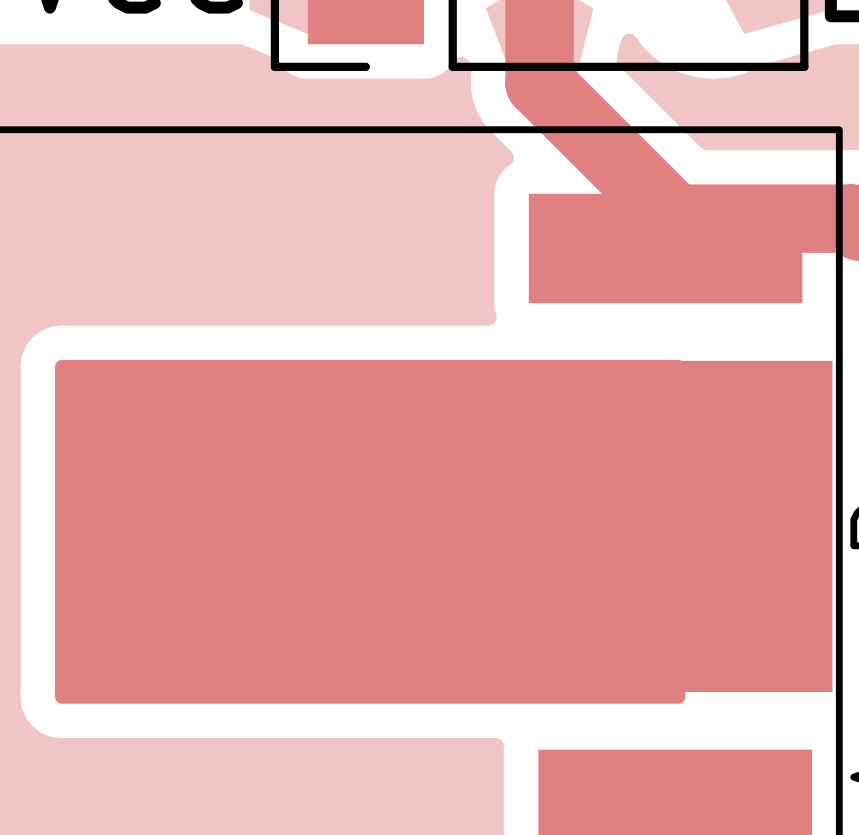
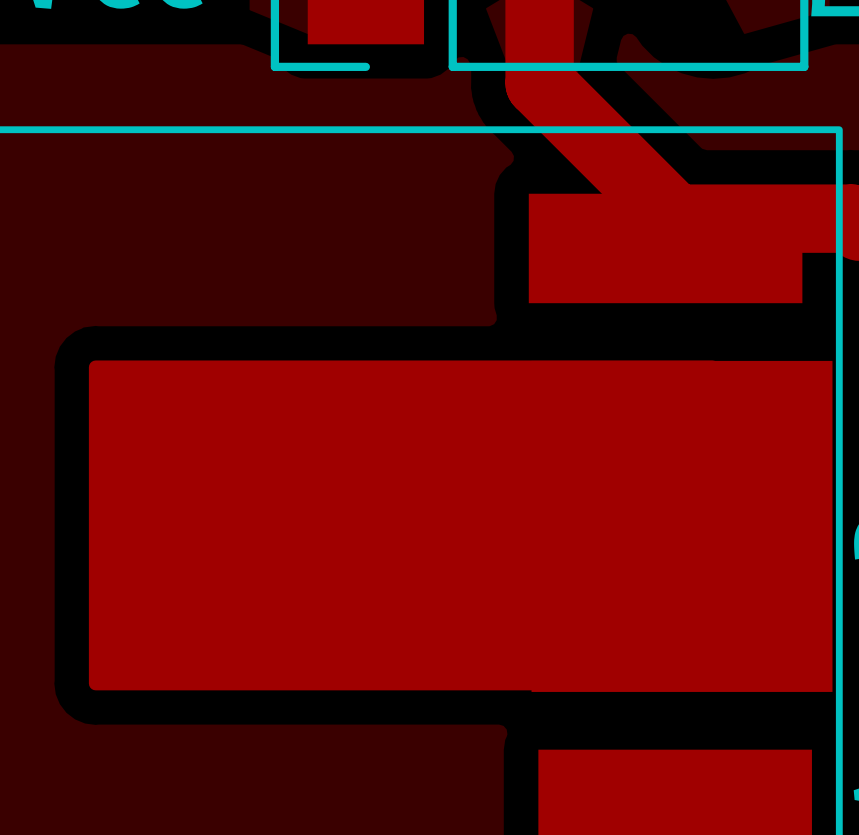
drawing shape: [55, 359, 686, 704] -> [88, 360, 720, 691]

